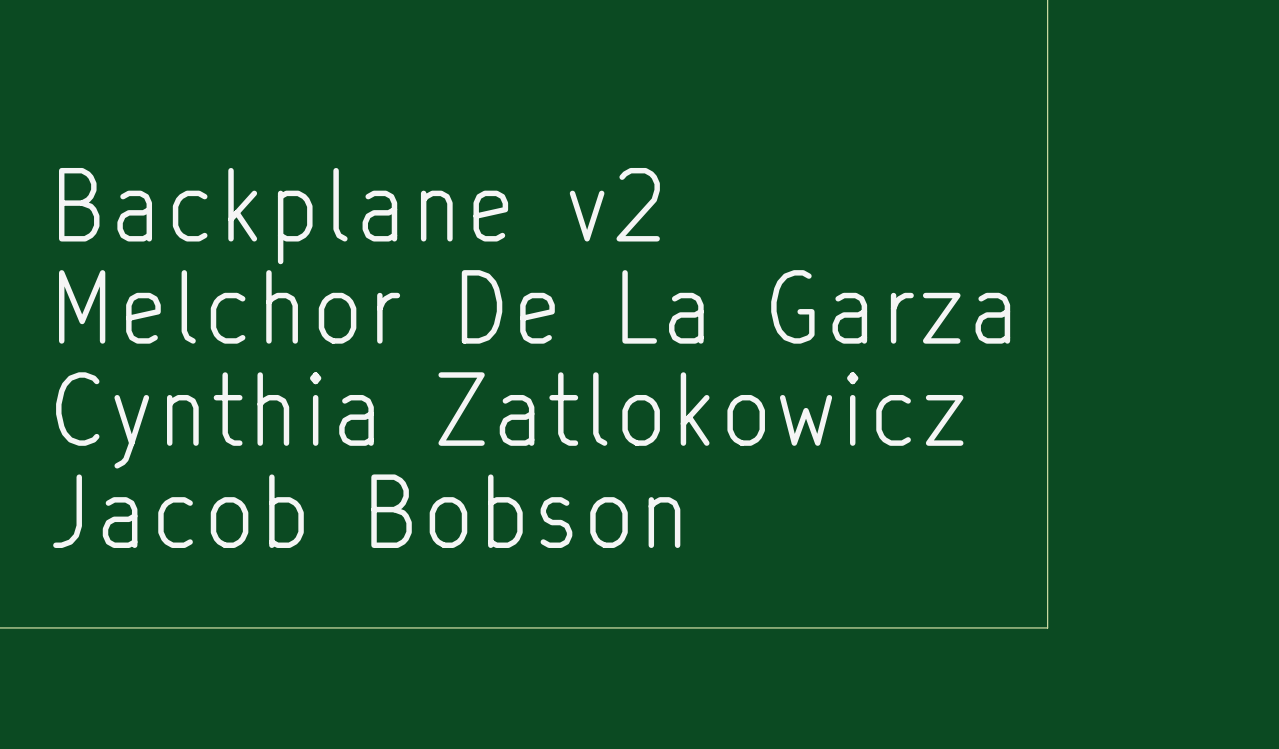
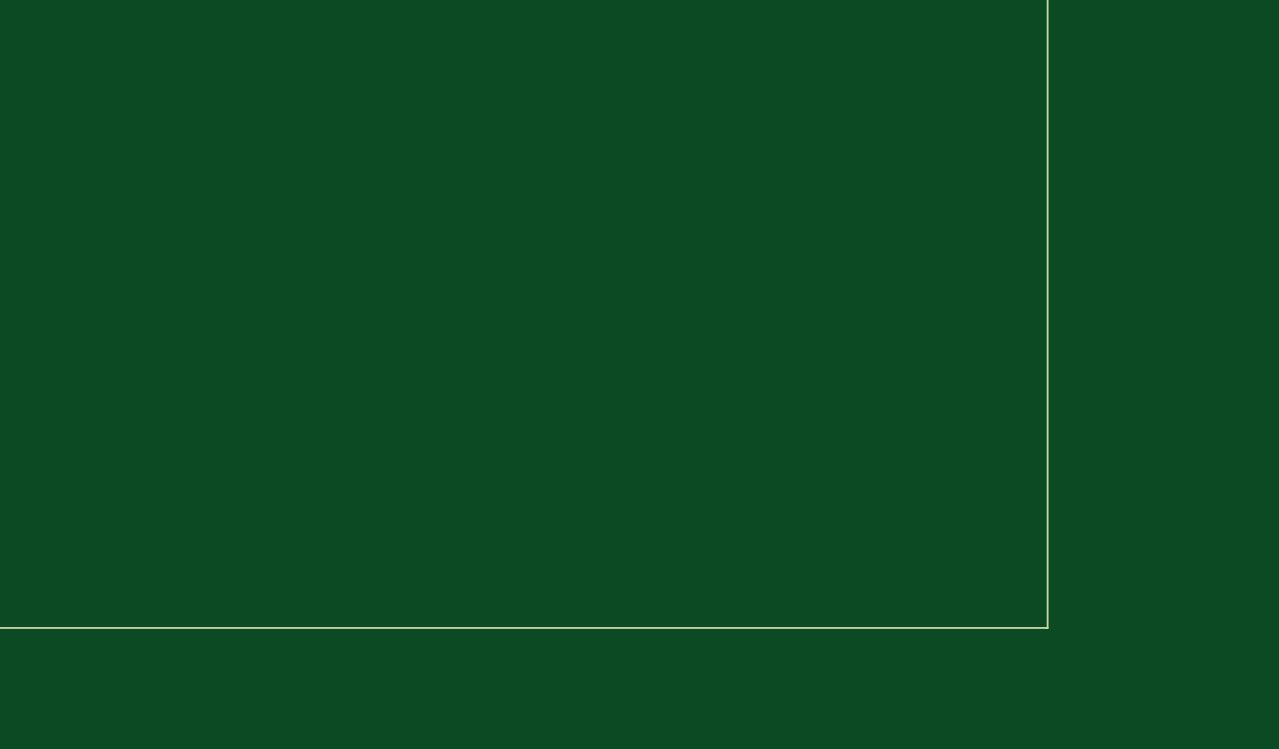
text: Backplane v2 (359, 216) -> none
text: Melchor De La Garza (534, 306) -> none
text: Cynthia Zatlokowicz (509, 420) -> none
text: Jacob Bobson (366, 511) -> none

